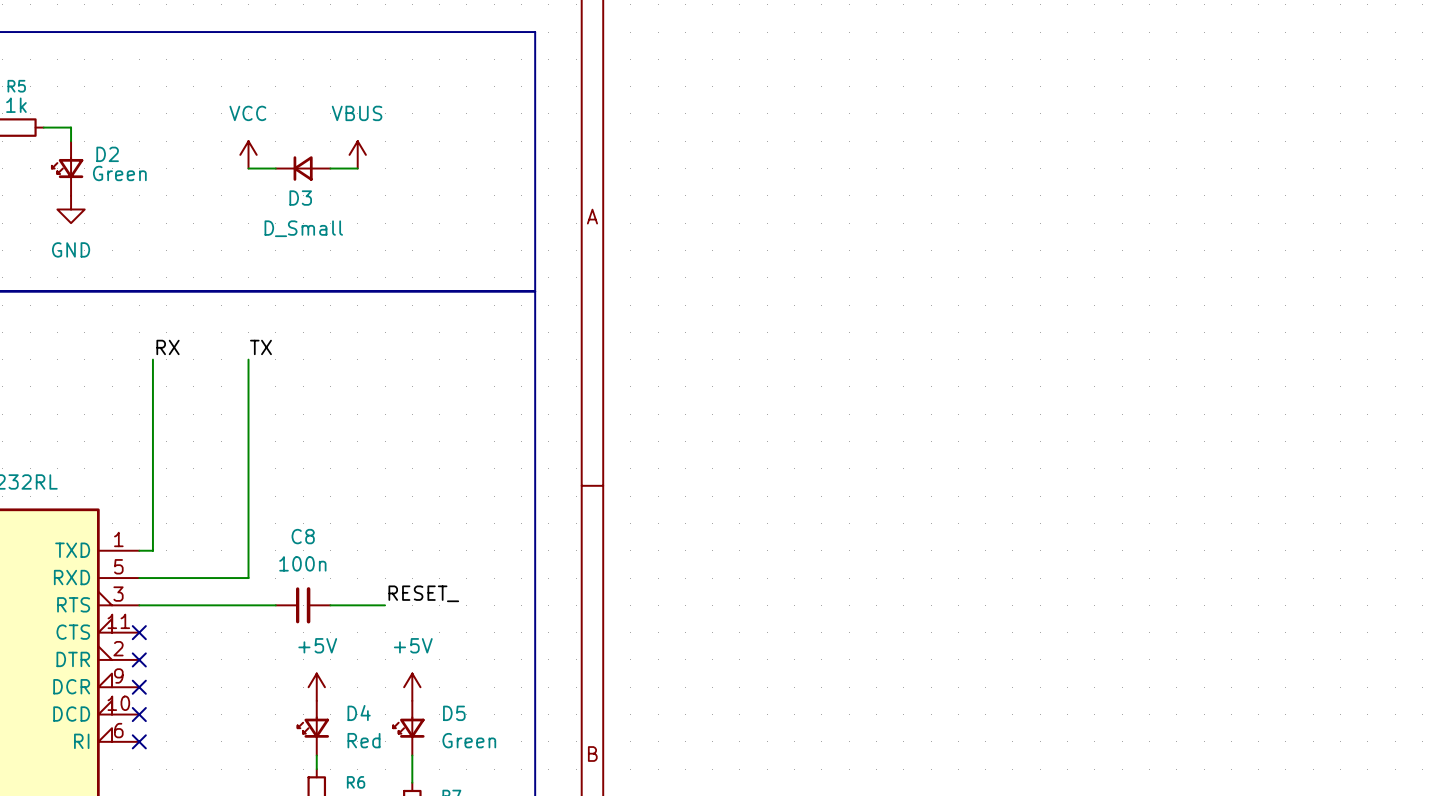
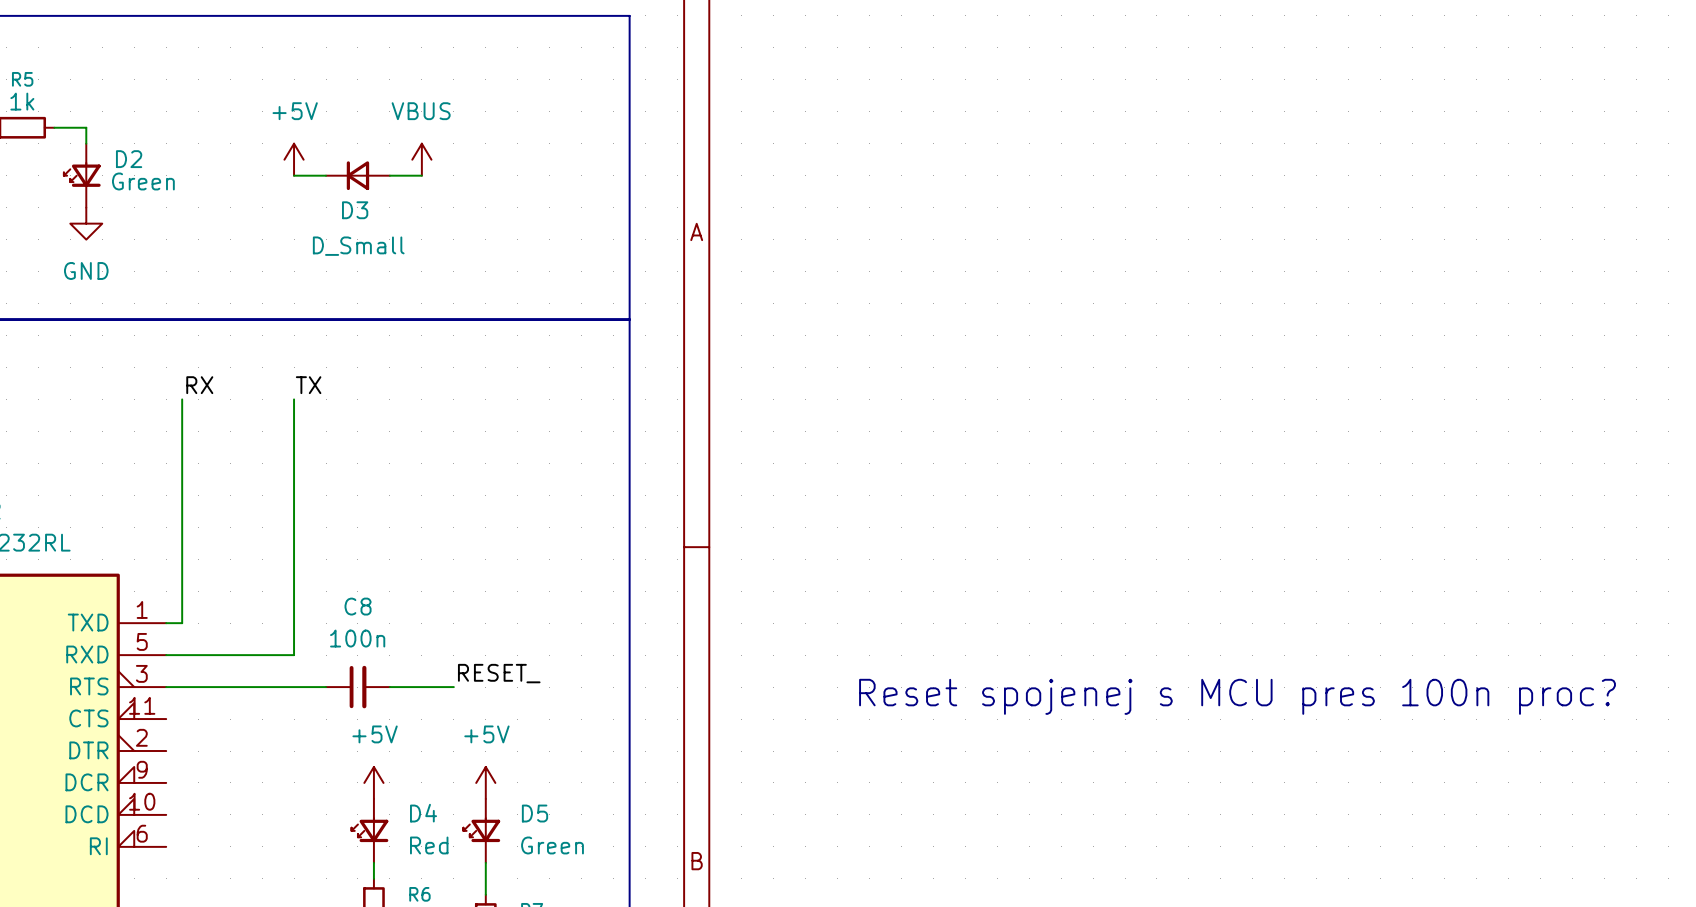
power symbol: VCC (248, 154) -> +5V (294, 159)
text: none -> Reset spojenej s MCU pres 100n proc? (1237, 696)
no-connect mark: (139, 632) -> none
no-connect mark: (139, 659) -> none
no-connect mark: (139, 687) -> none
no-connect mark: (139, 714) -> none
no-connect mark: (139, 741) -> none

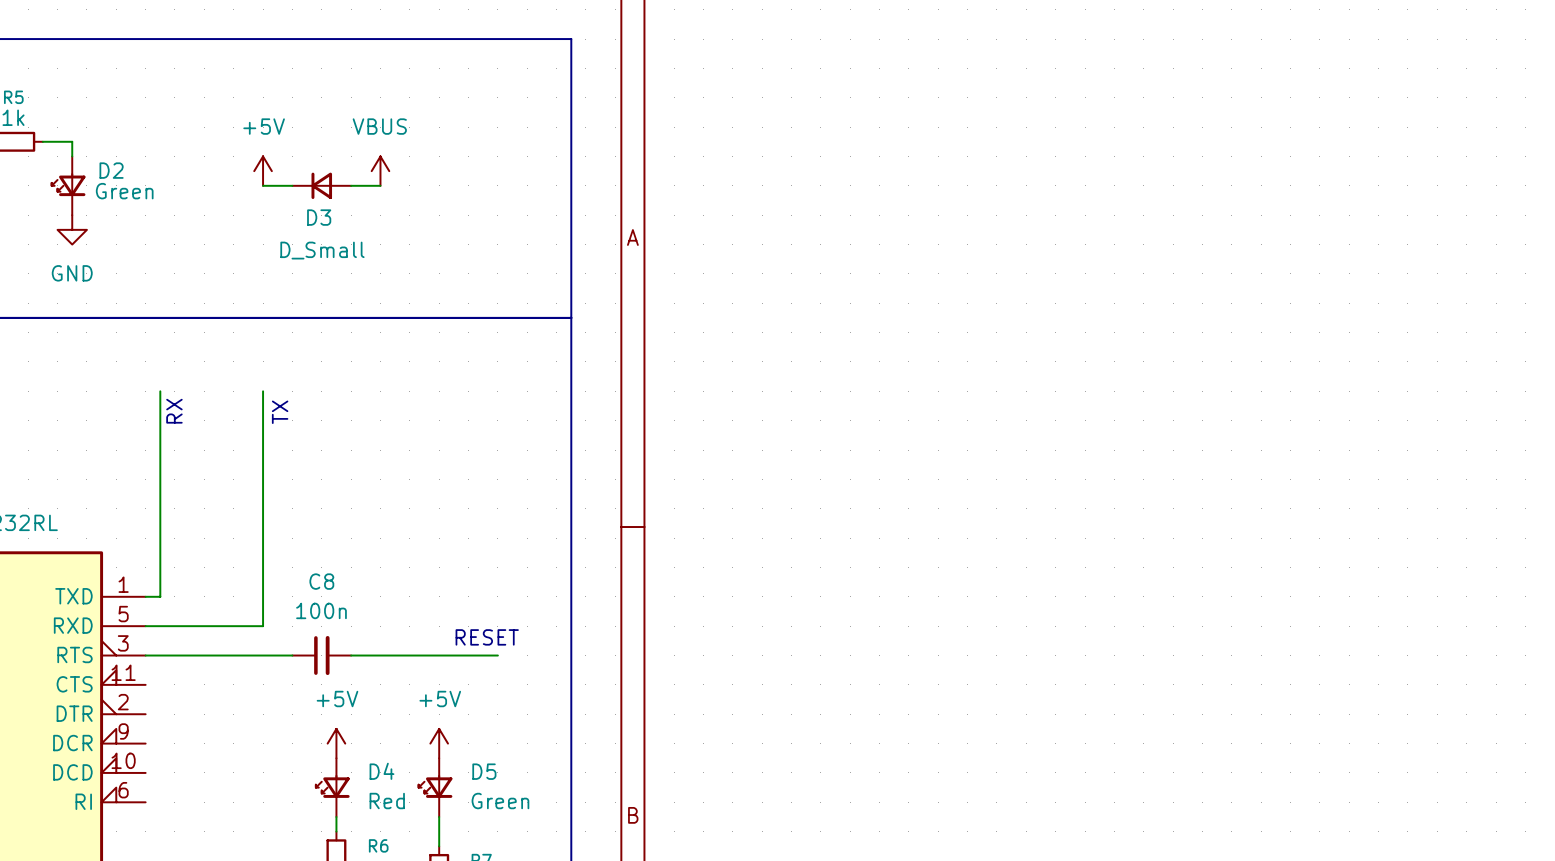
label: RX (199, 385) -> none
label: TX (308, 385) -> none
text: none -> RX (174, 411)
text: none -> TX (280, 412)
text: none -> RESET (487, 637)
label: RESET_ (499, 673) -> none
wire: none -> (409, 655) (497, 655)
text: Reset spojenej s MCU pres 100n proc? (1237, 696) -> none

